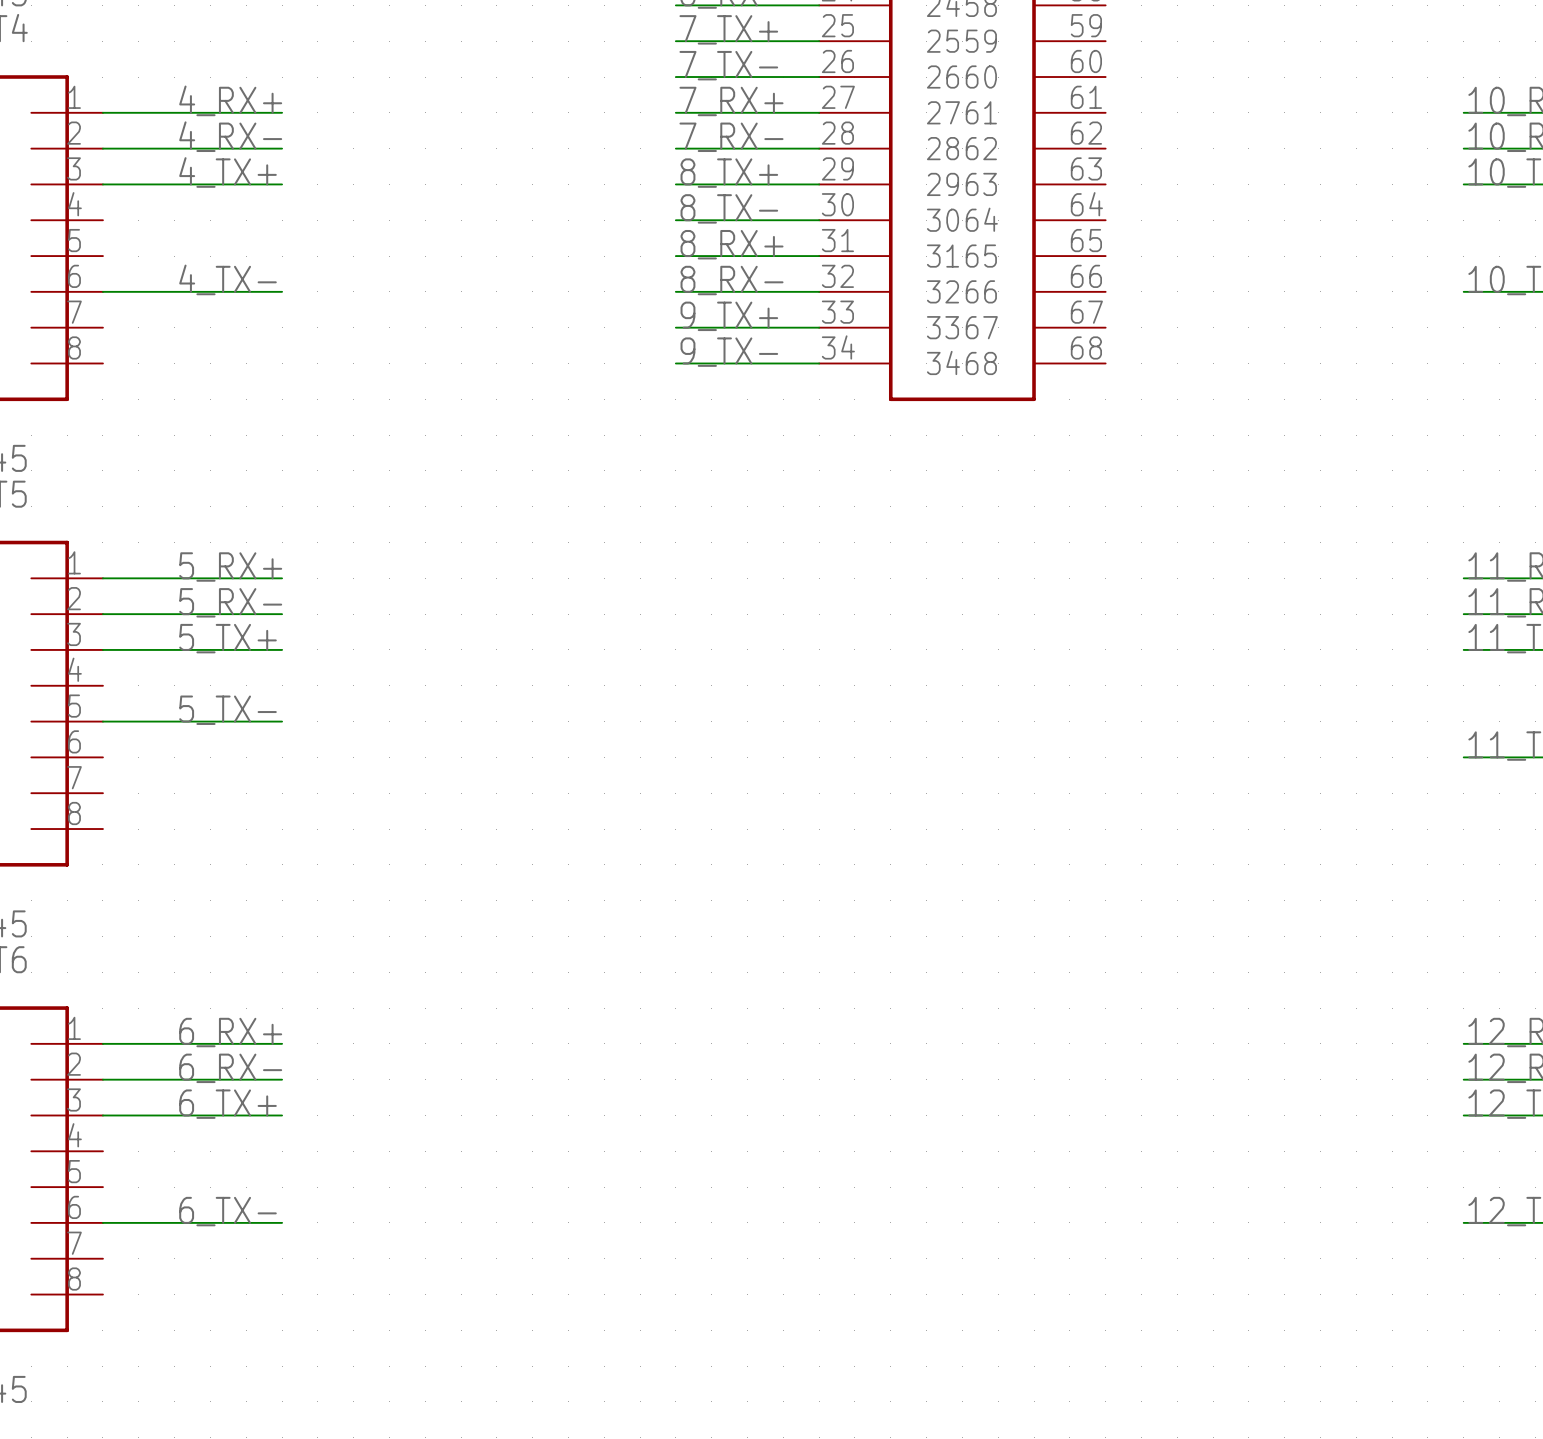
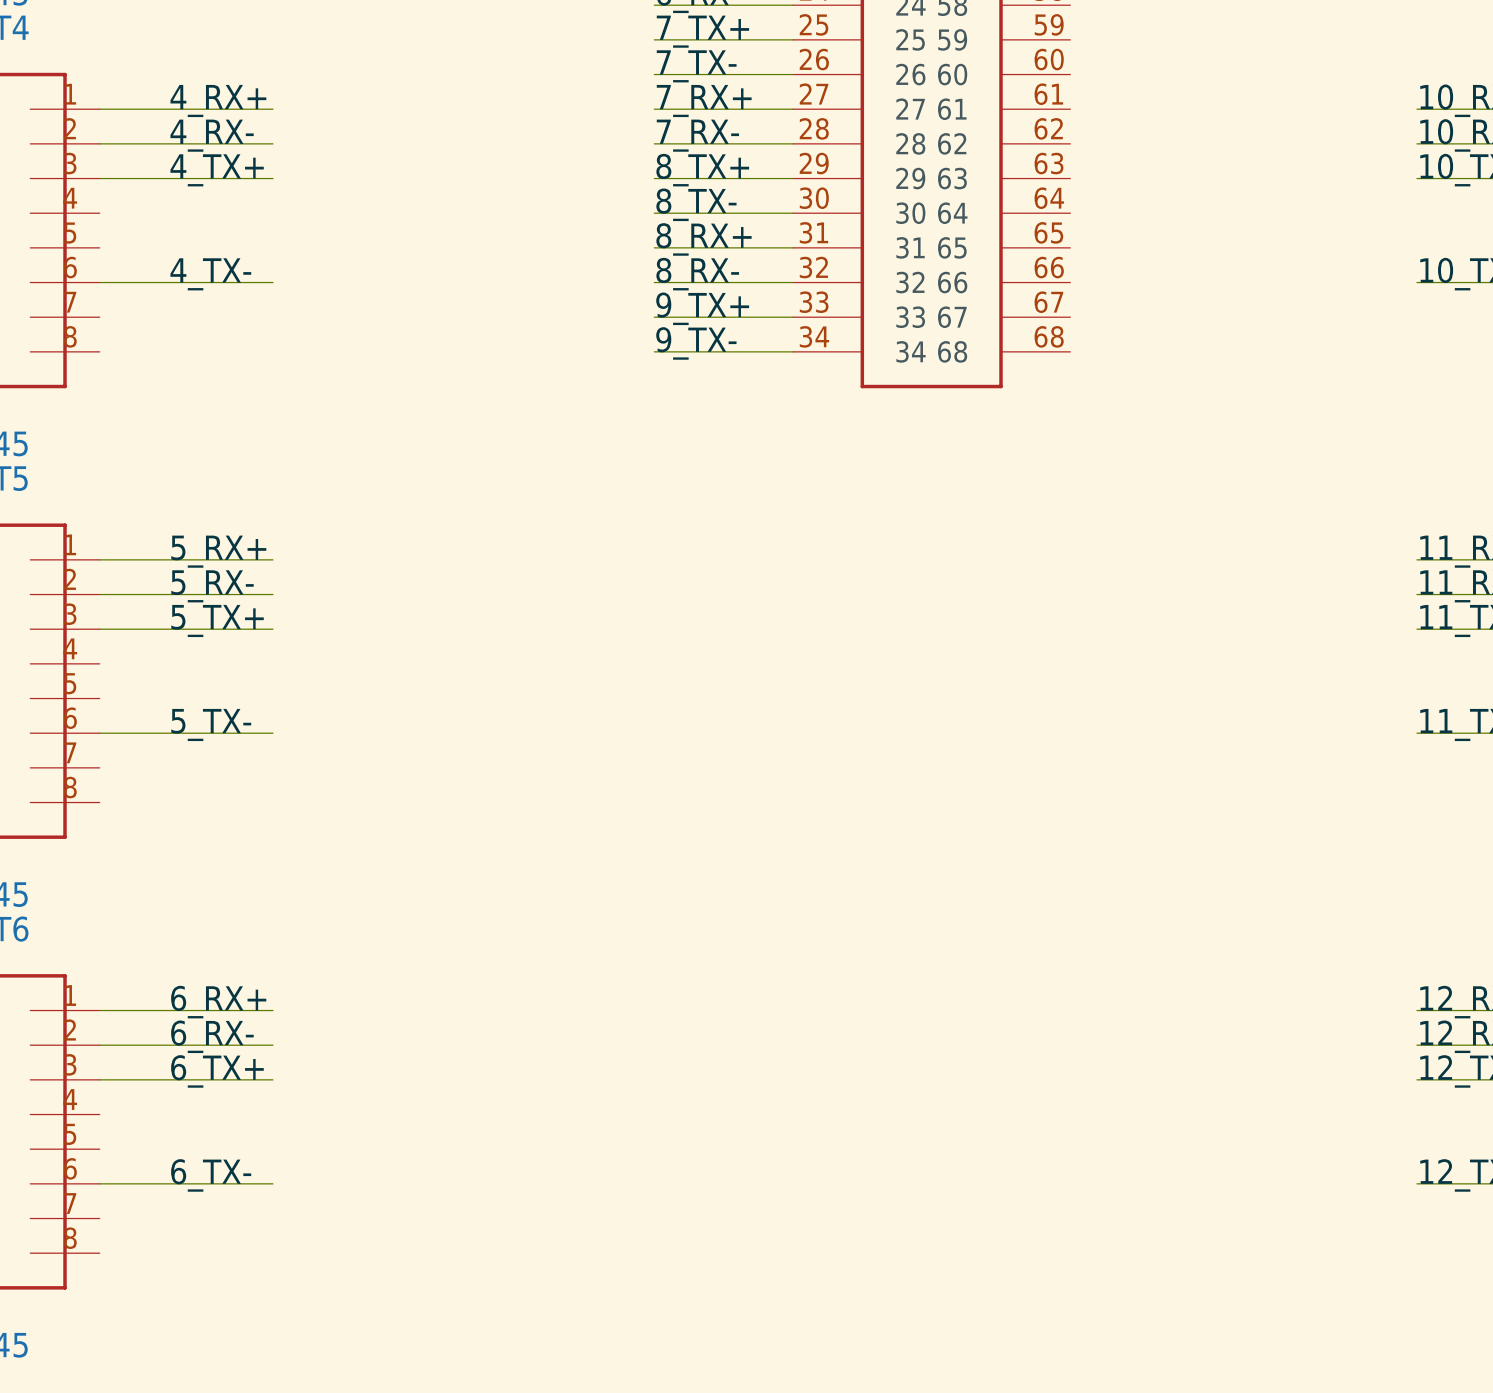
label position: 5_TX- (227, 710) -> 5_TX- (211, 724)
wire: (102, 721) (282, 721) -> (99, 733) (272, 733)

